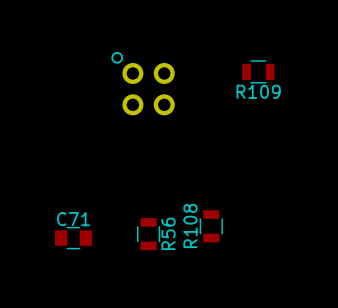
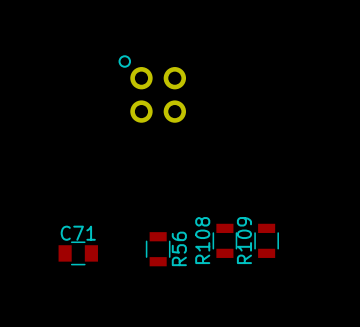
R109 rotation: 0° (258, 71) -> 90° clockwise (266, 240)
R109 position: (258, 71) -> (266, 240)

